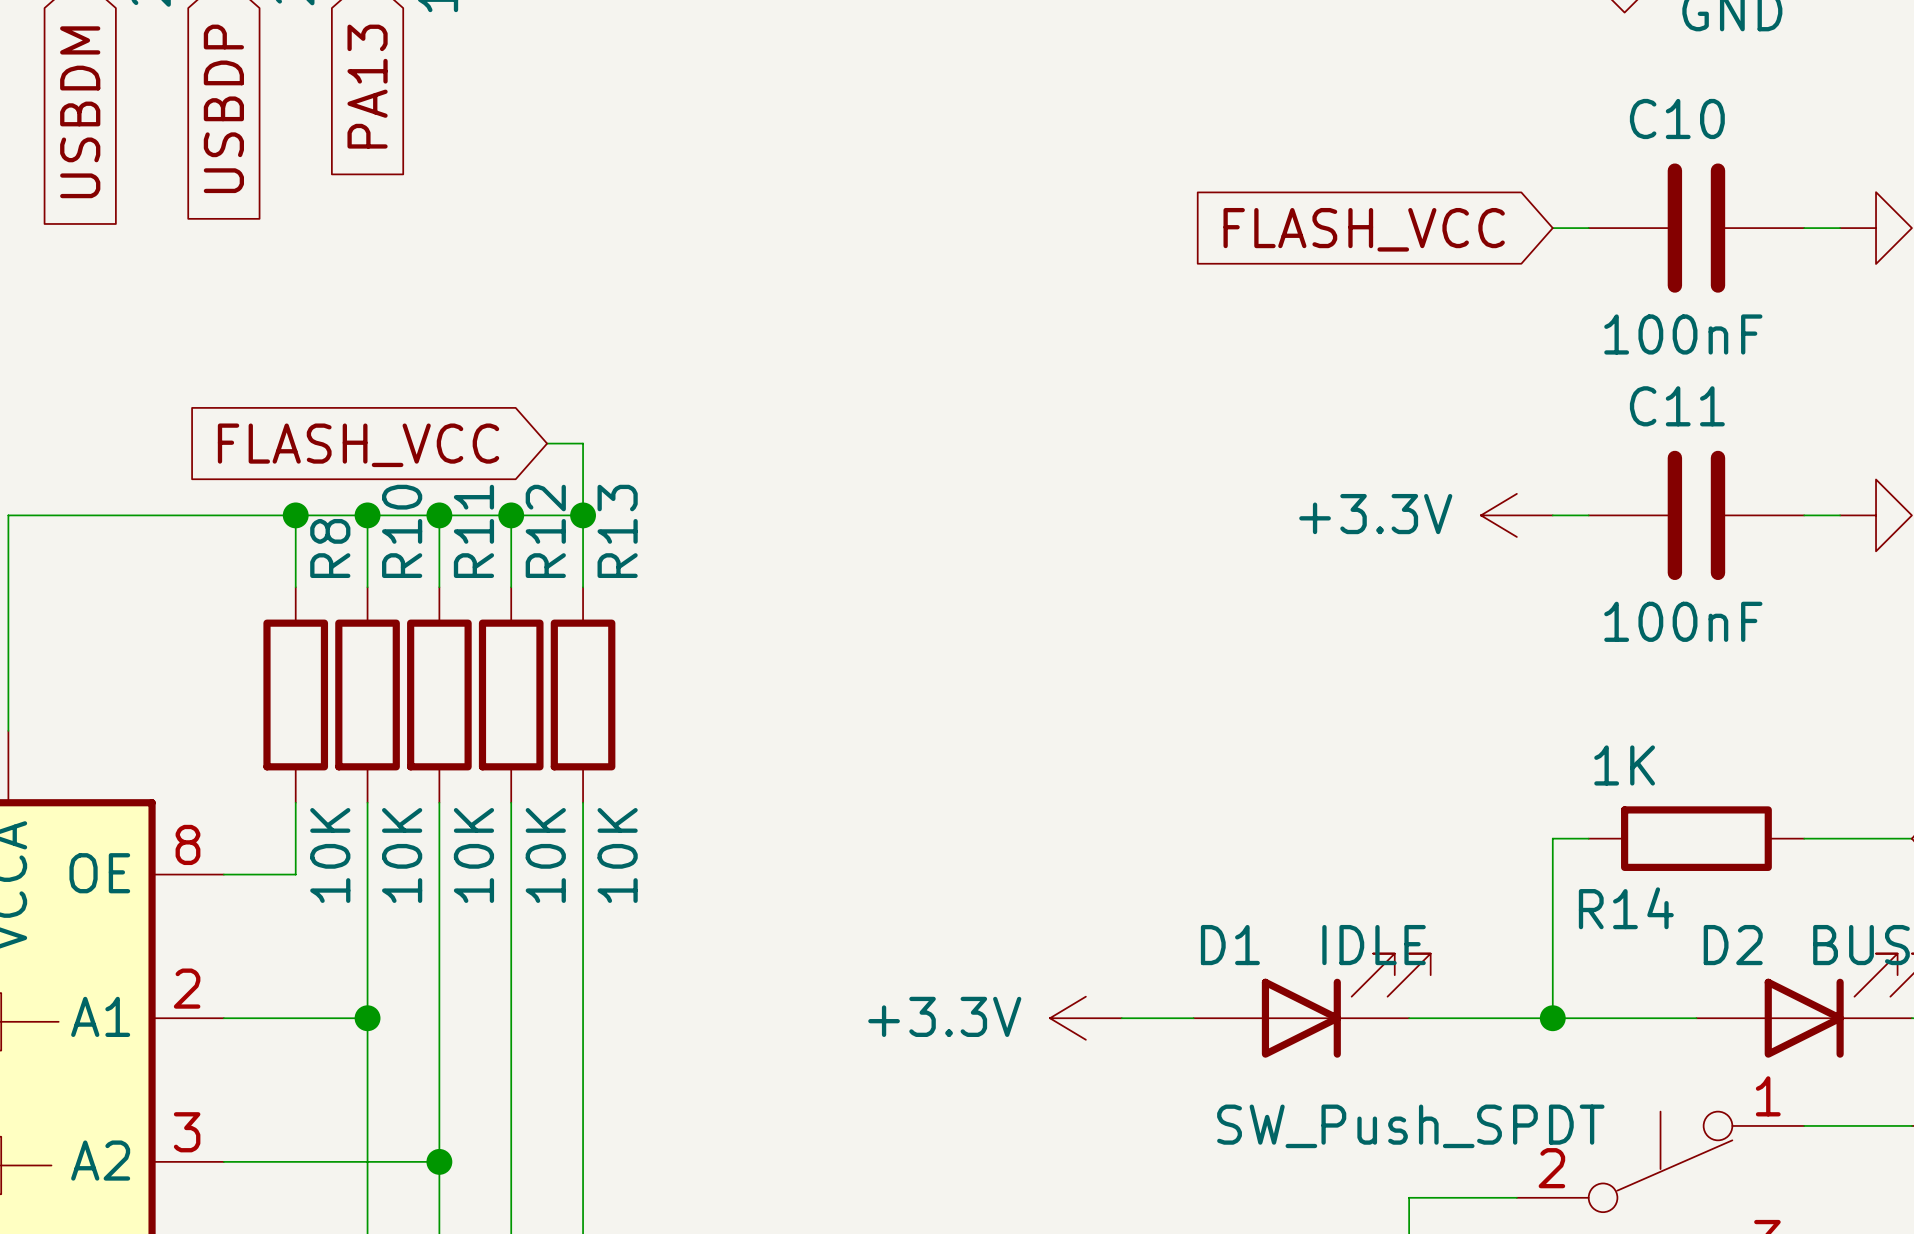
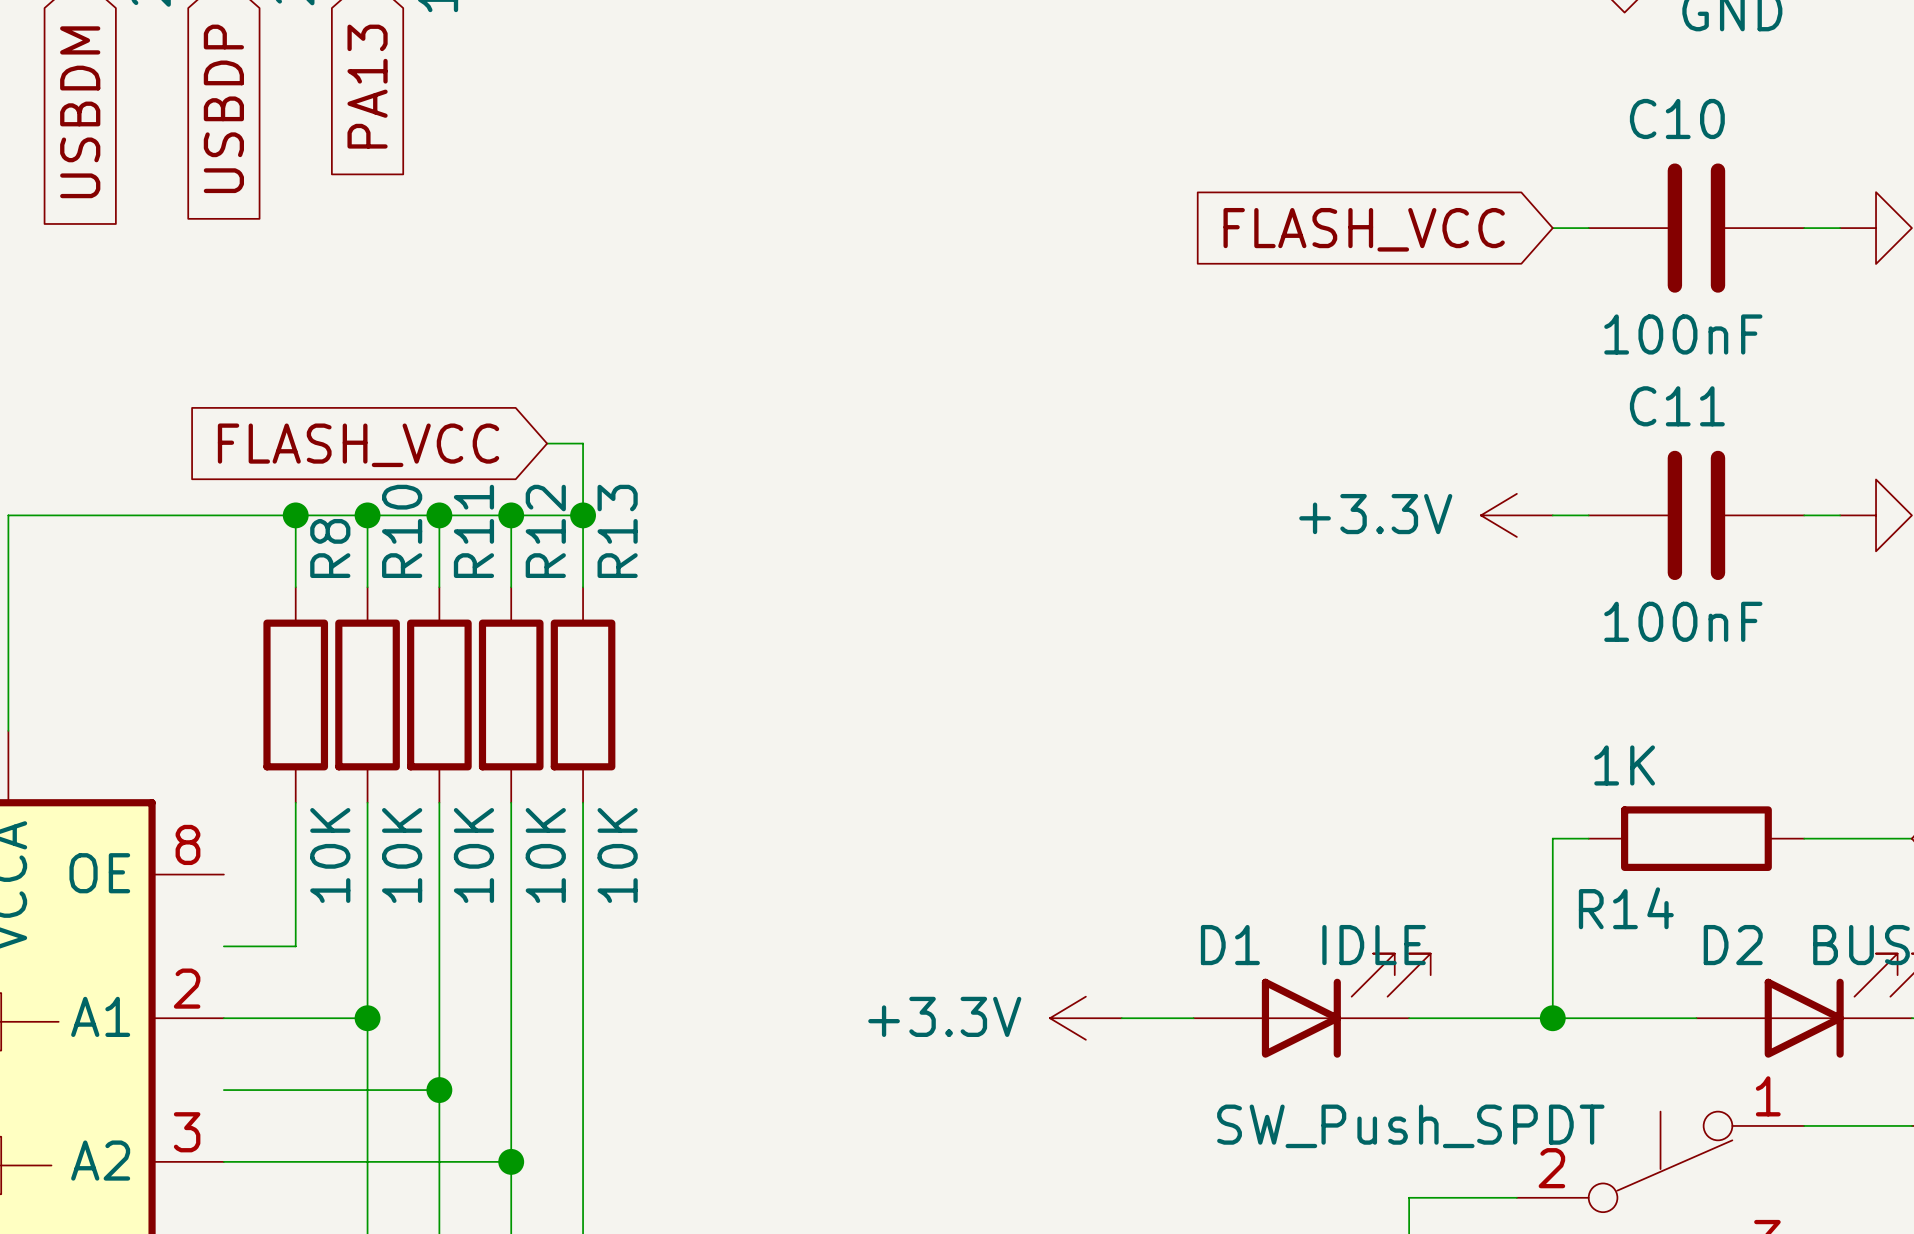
wire: (223, 874) (295, 874) -> (223, 946) (295, 946) (295, 874)
wire: none -> (223, 1090) (439, 1090)
junction: none -> (439, 1090)
wire: none -> (439, 1161) (511, 1161)
junction: (439, 1161) -> none
junction: none -> (511, 1161)

